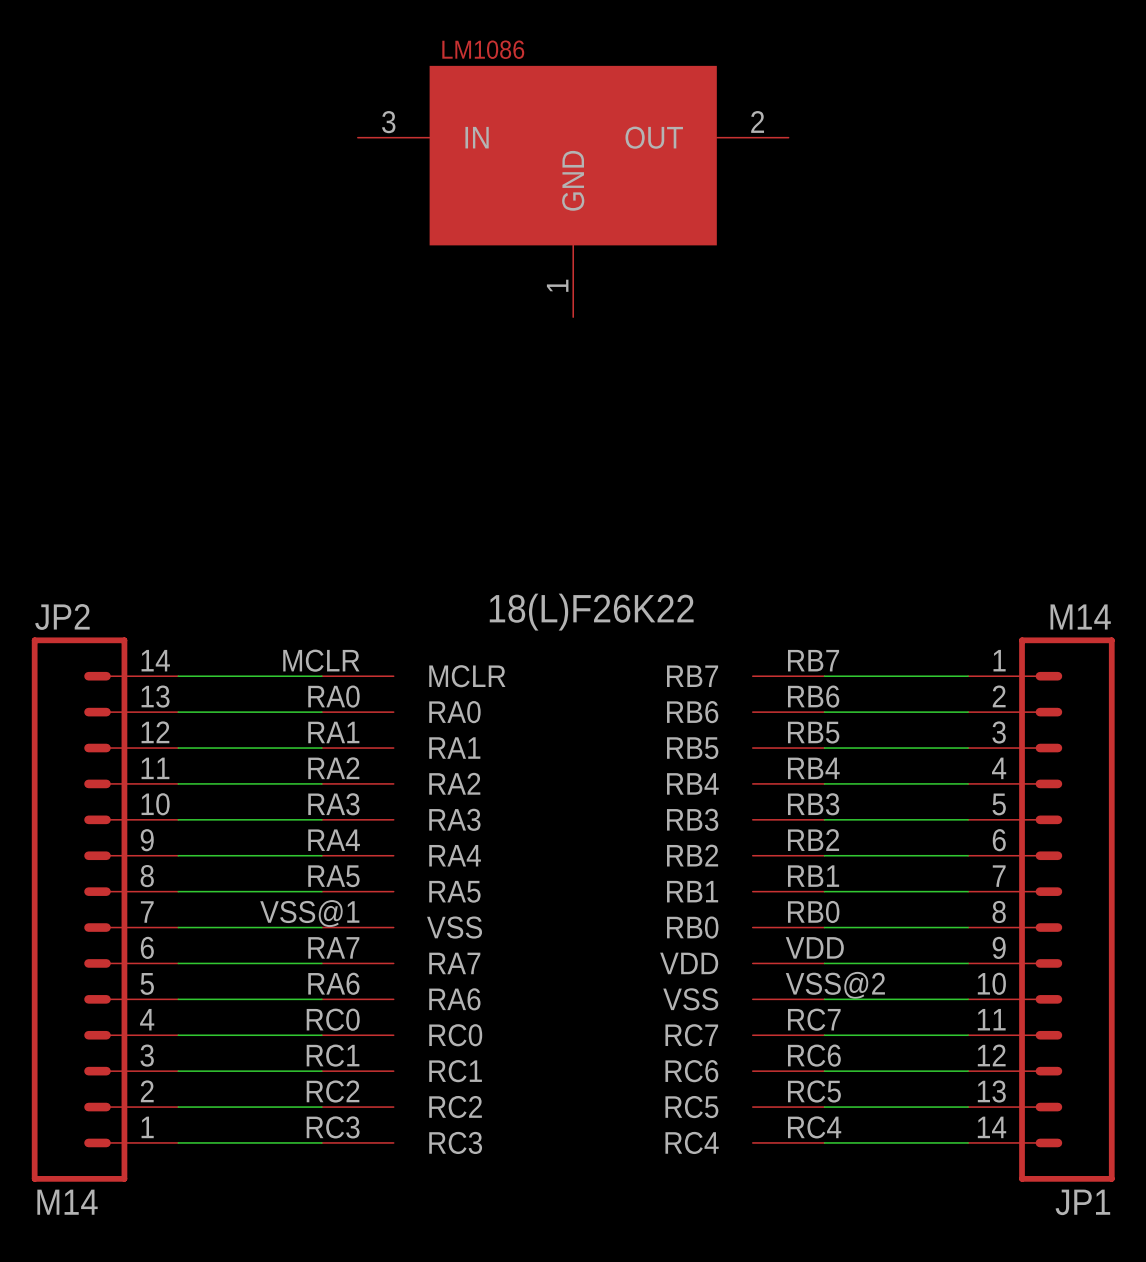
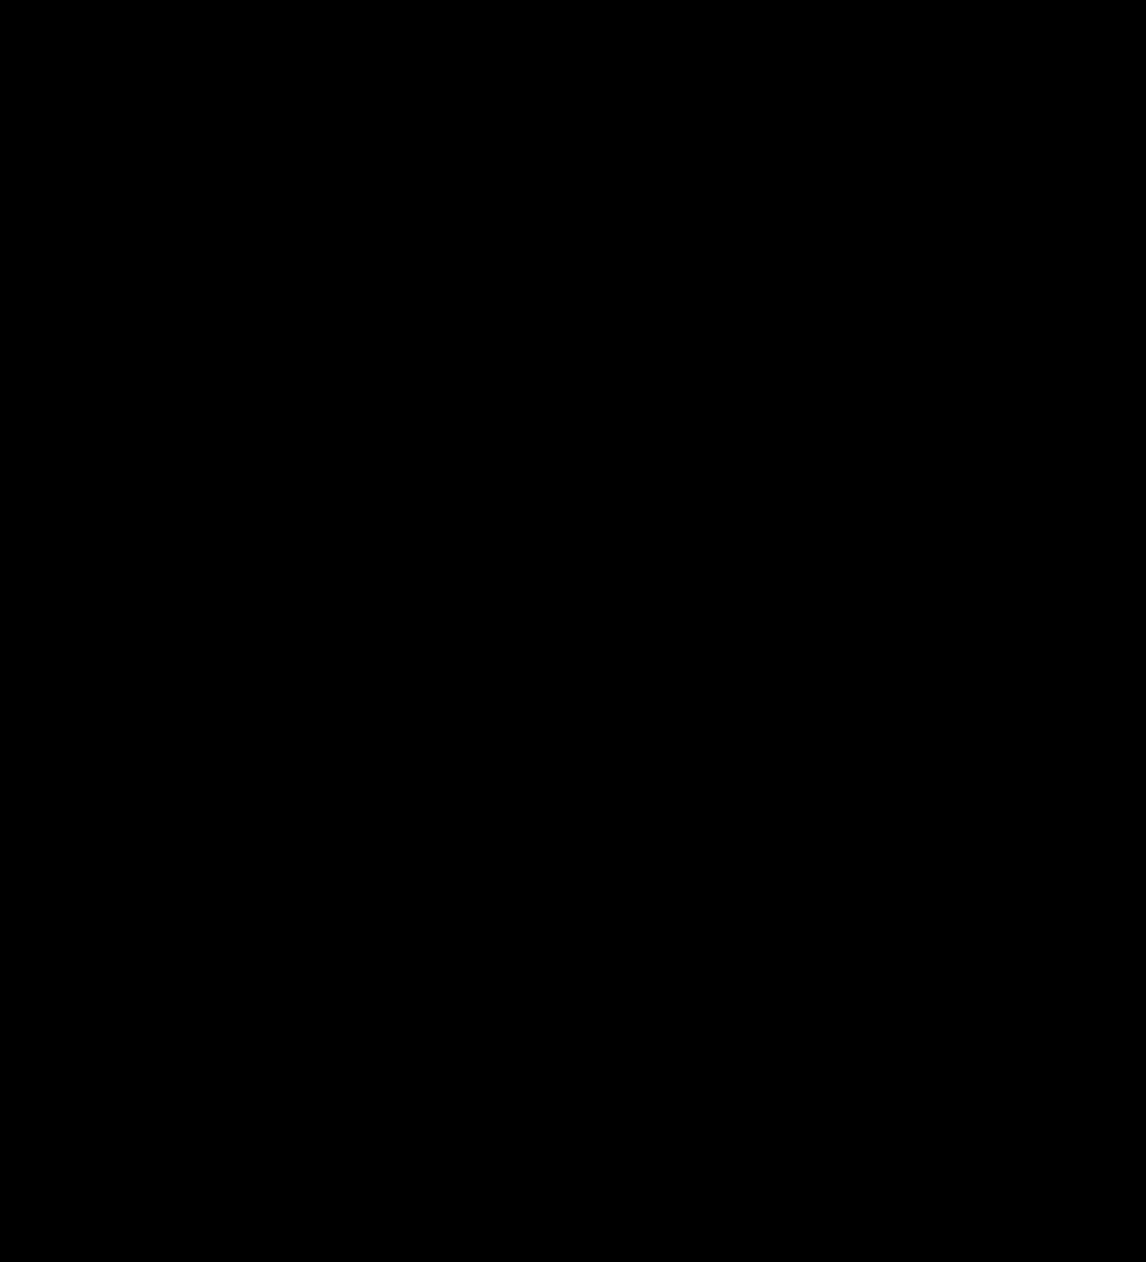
part: (573, 191) -> none
wire: (178, 676) (321, 676) -> none
wire: (824, 676) (968, 676) -> none
wire: (178, 712) (321, 712) -> none
wire: (824, 712) (968, 712) -> none
wire: (178, 748) (321, 748) -> none
wire: (824, 748) (968, 748) -> none
wire: (178, 783) (321, 783) -> none
wire: (824, 783) (968, 783) -> none
wire: (178, 819) (321, 819) -> none
wire: (824, 819) (968, 819) -> none
wire: (178, 855) (321, 855) -> none
wire: (824, 855) (968, 855) -> none
wire: (178, 891) (321, 891) -> none
wire: (824, 891) (968, 891) -> none
JP2: M14 (105, 909) -> none
part: (573, 909) -> none
JP1: M14 (1041, 909) -> none
wire: (178, 927) (321, 927) -> none
wire: (824, 927) (968, 927) -> none
wire: (178, 963) (321, 963) -> none
wire: (824, 963) (968, 963) -> none
wire: (178, 999) (321, 999) -> none
wire: (824, 999) (968, 999) -> none
wire: (178, 1035) (321, 1035) -> none
wire: (824, 1035) (968, 1035) -> none
wire: (178, 1071) (321, 1071) -> none
wire: (824, 1071) (968, 1071) -> none
wire: (178, 1107) (321, 1107) -> none
wire: (824, 1107) (968, 1107) -> none
wire: (178, 1142) (321, 1142) -> none
wire: (824, 1142) (968, 1142) -> none

